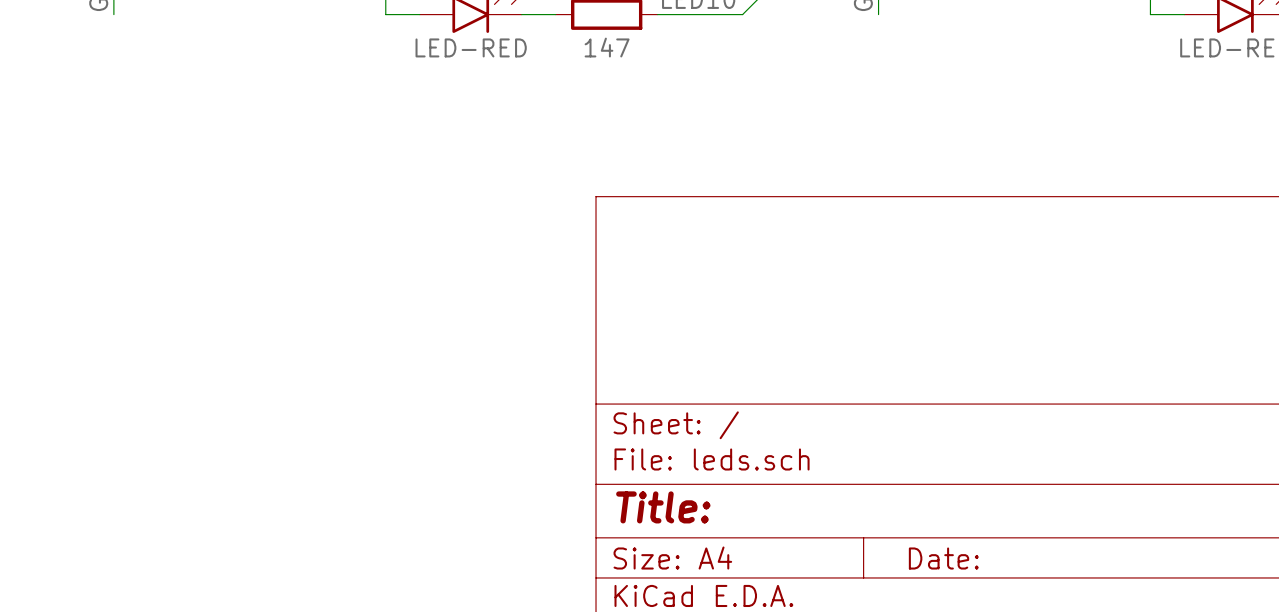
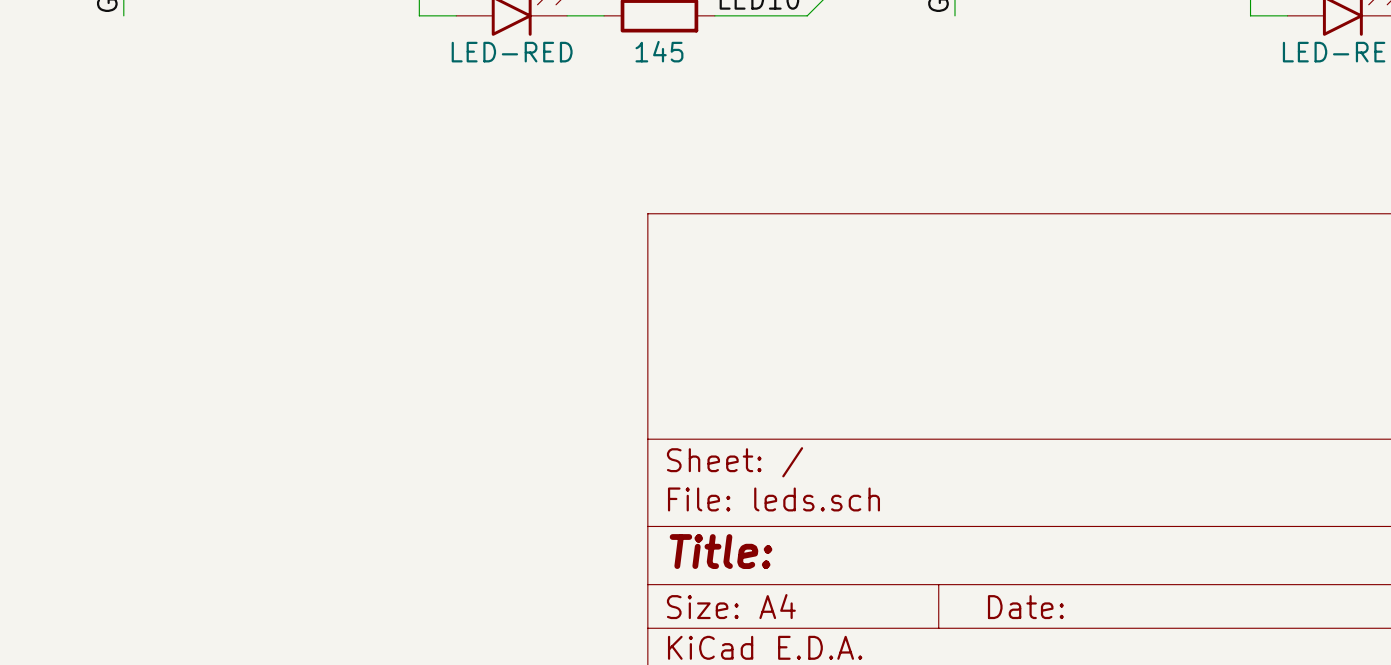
part value: 147 (607, 47) -> 145 (659, 51)

